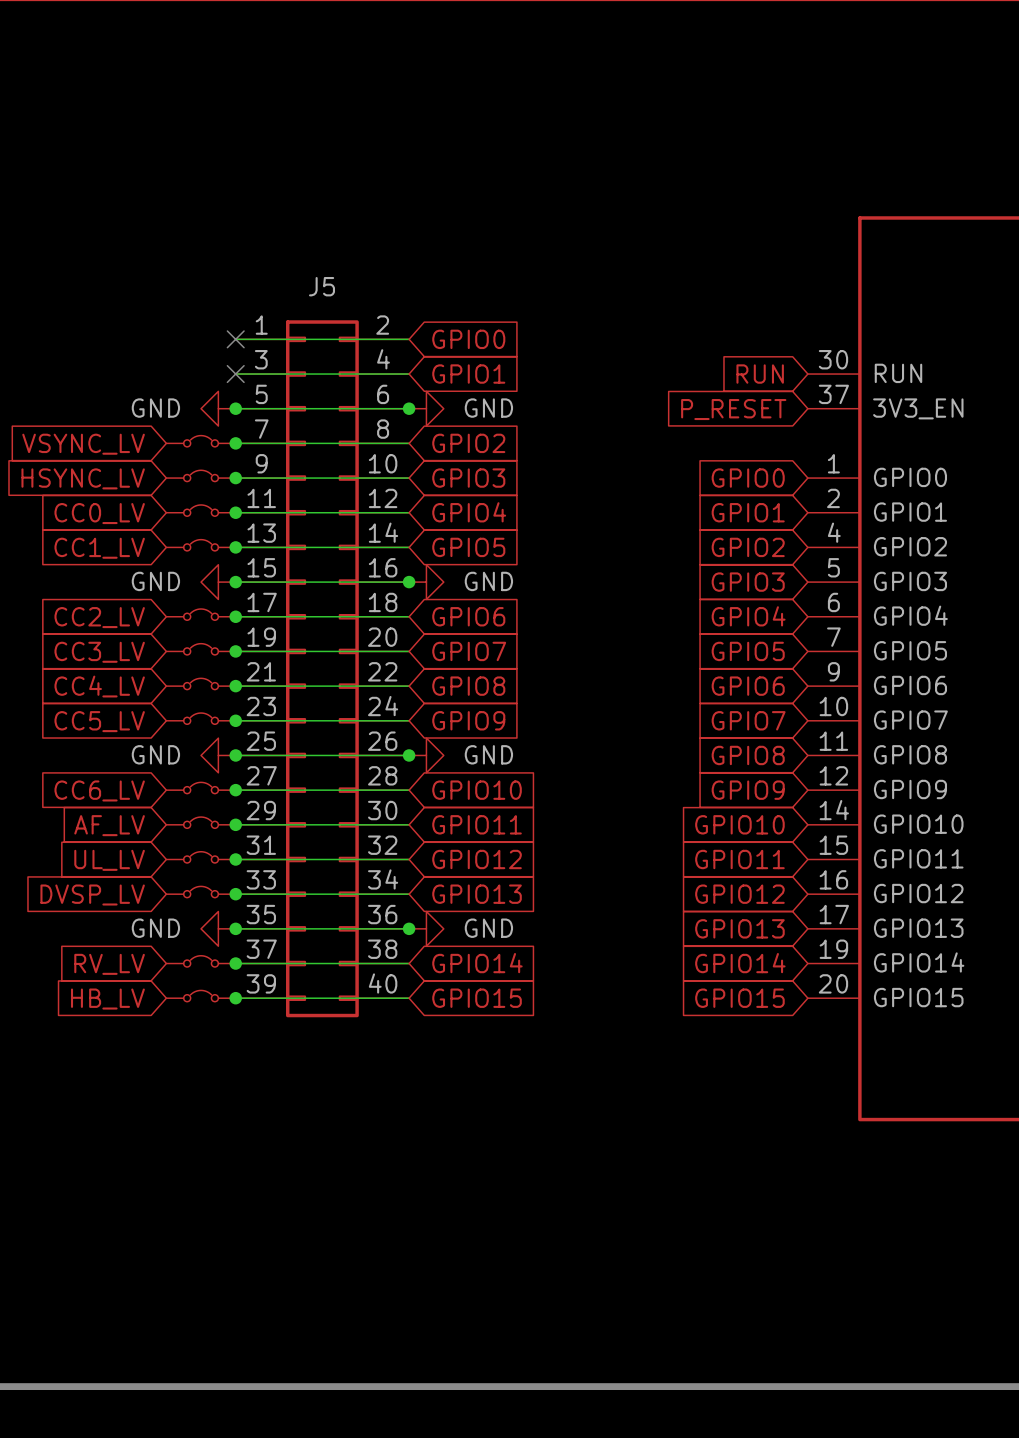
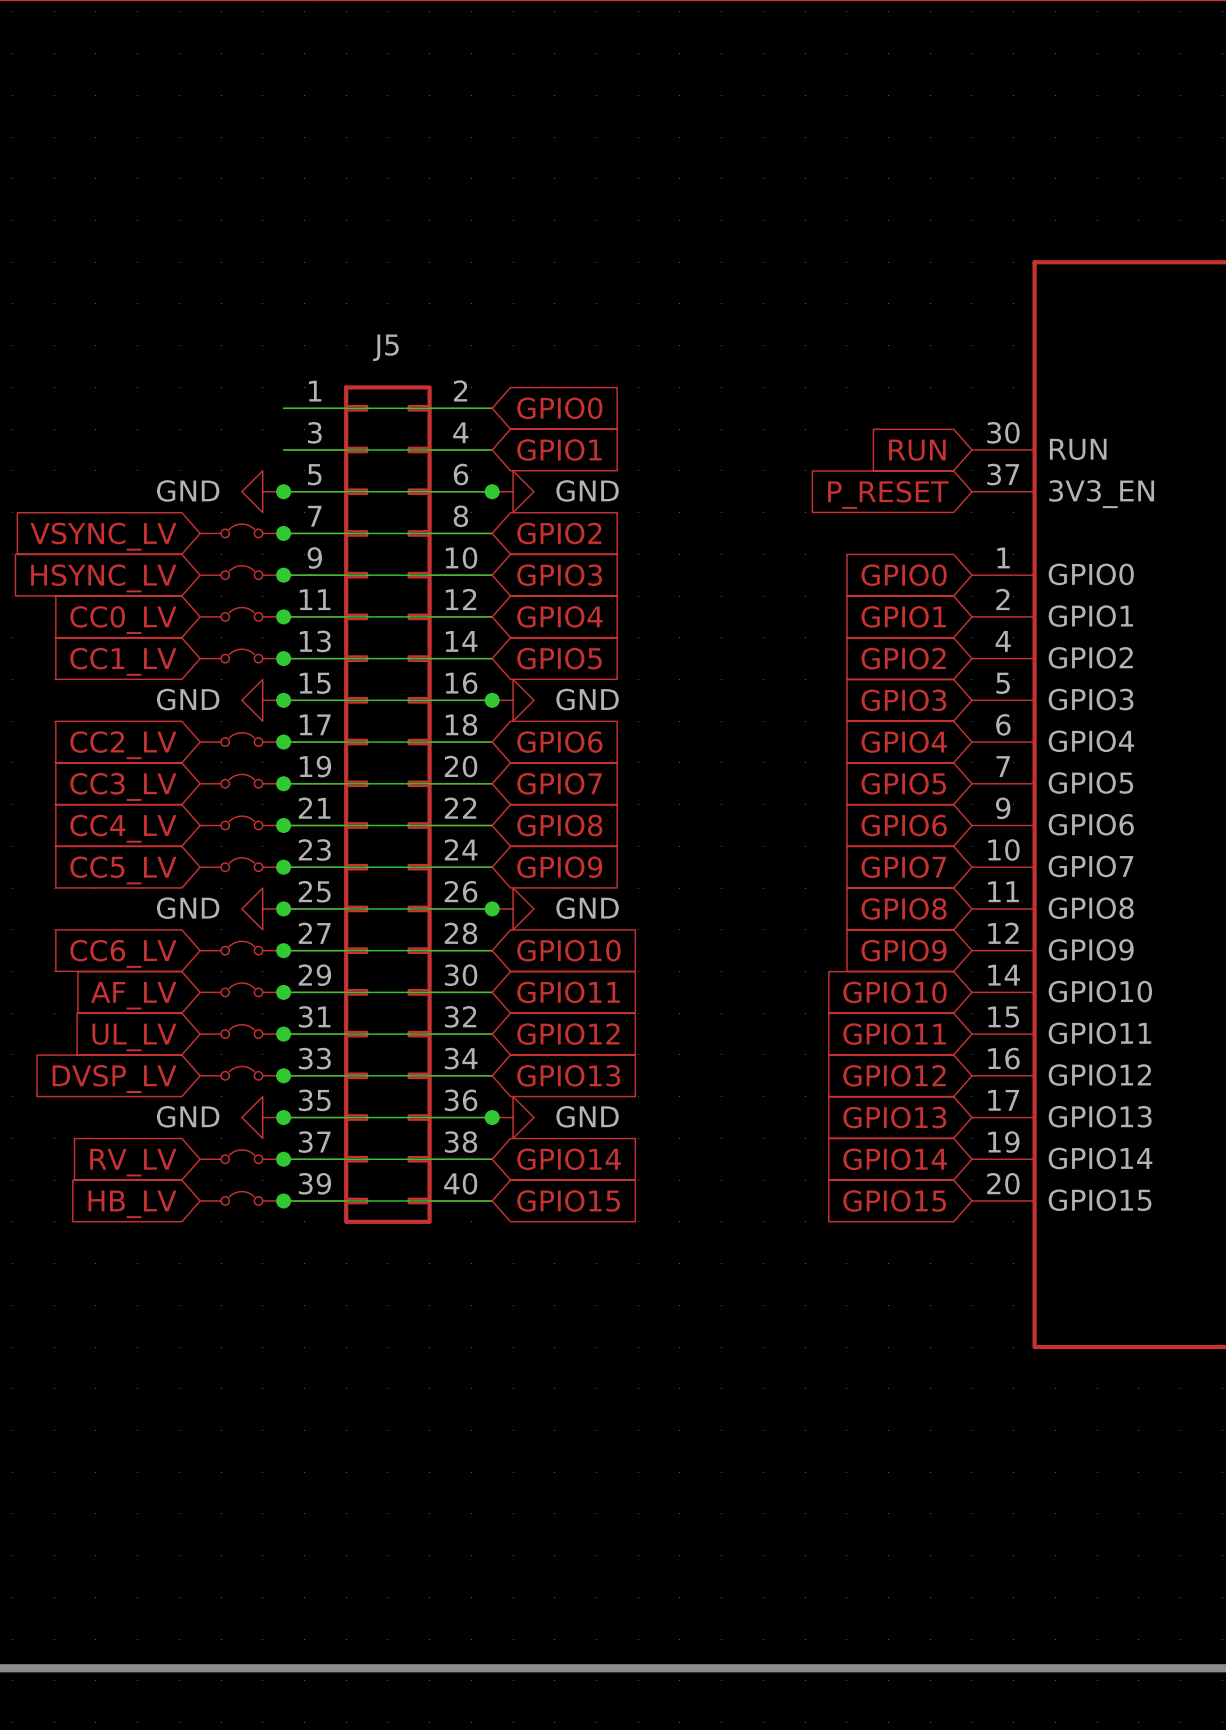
no-connect mark: (235, 339) -> none
no-connect mark: (235, 374) -> none

